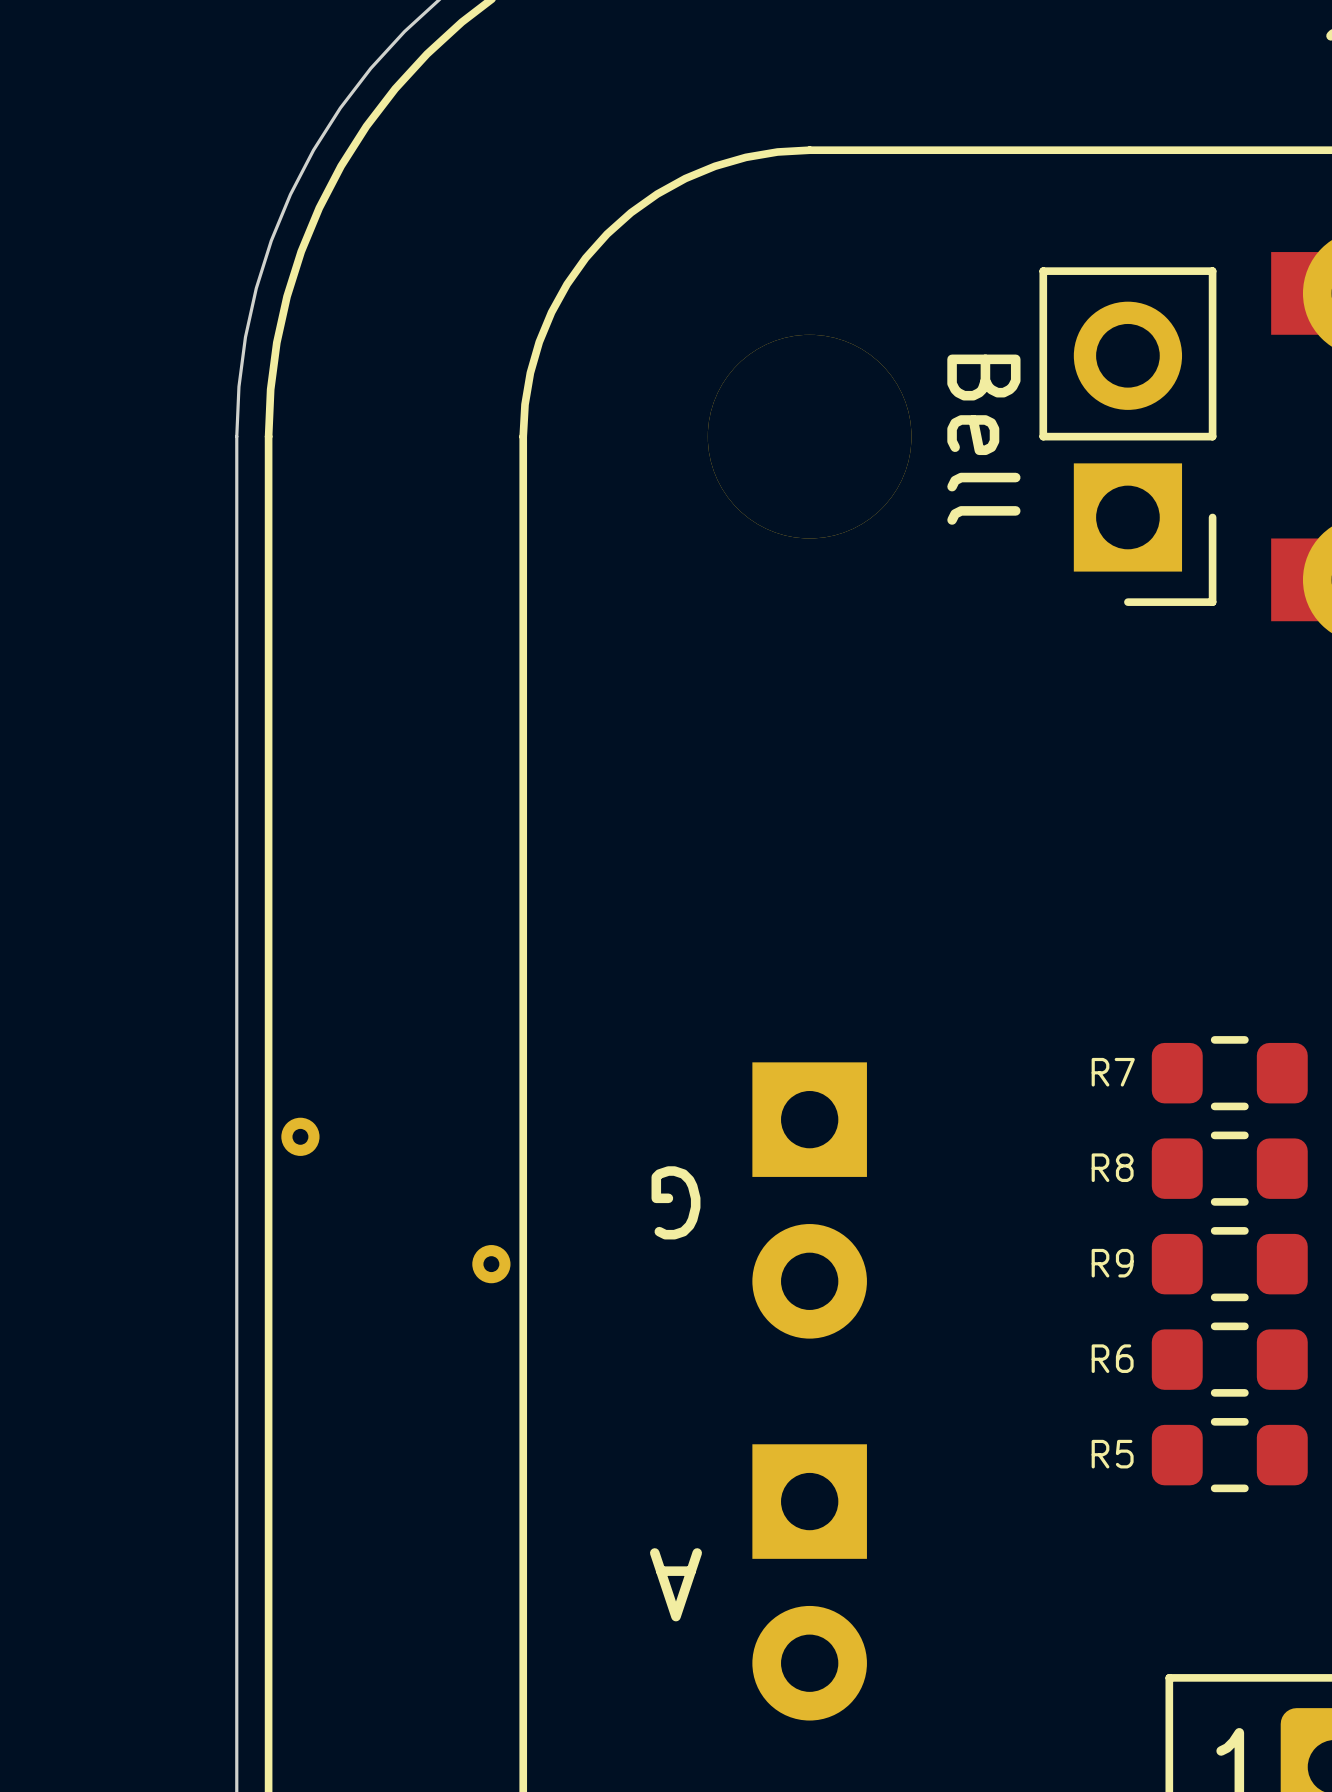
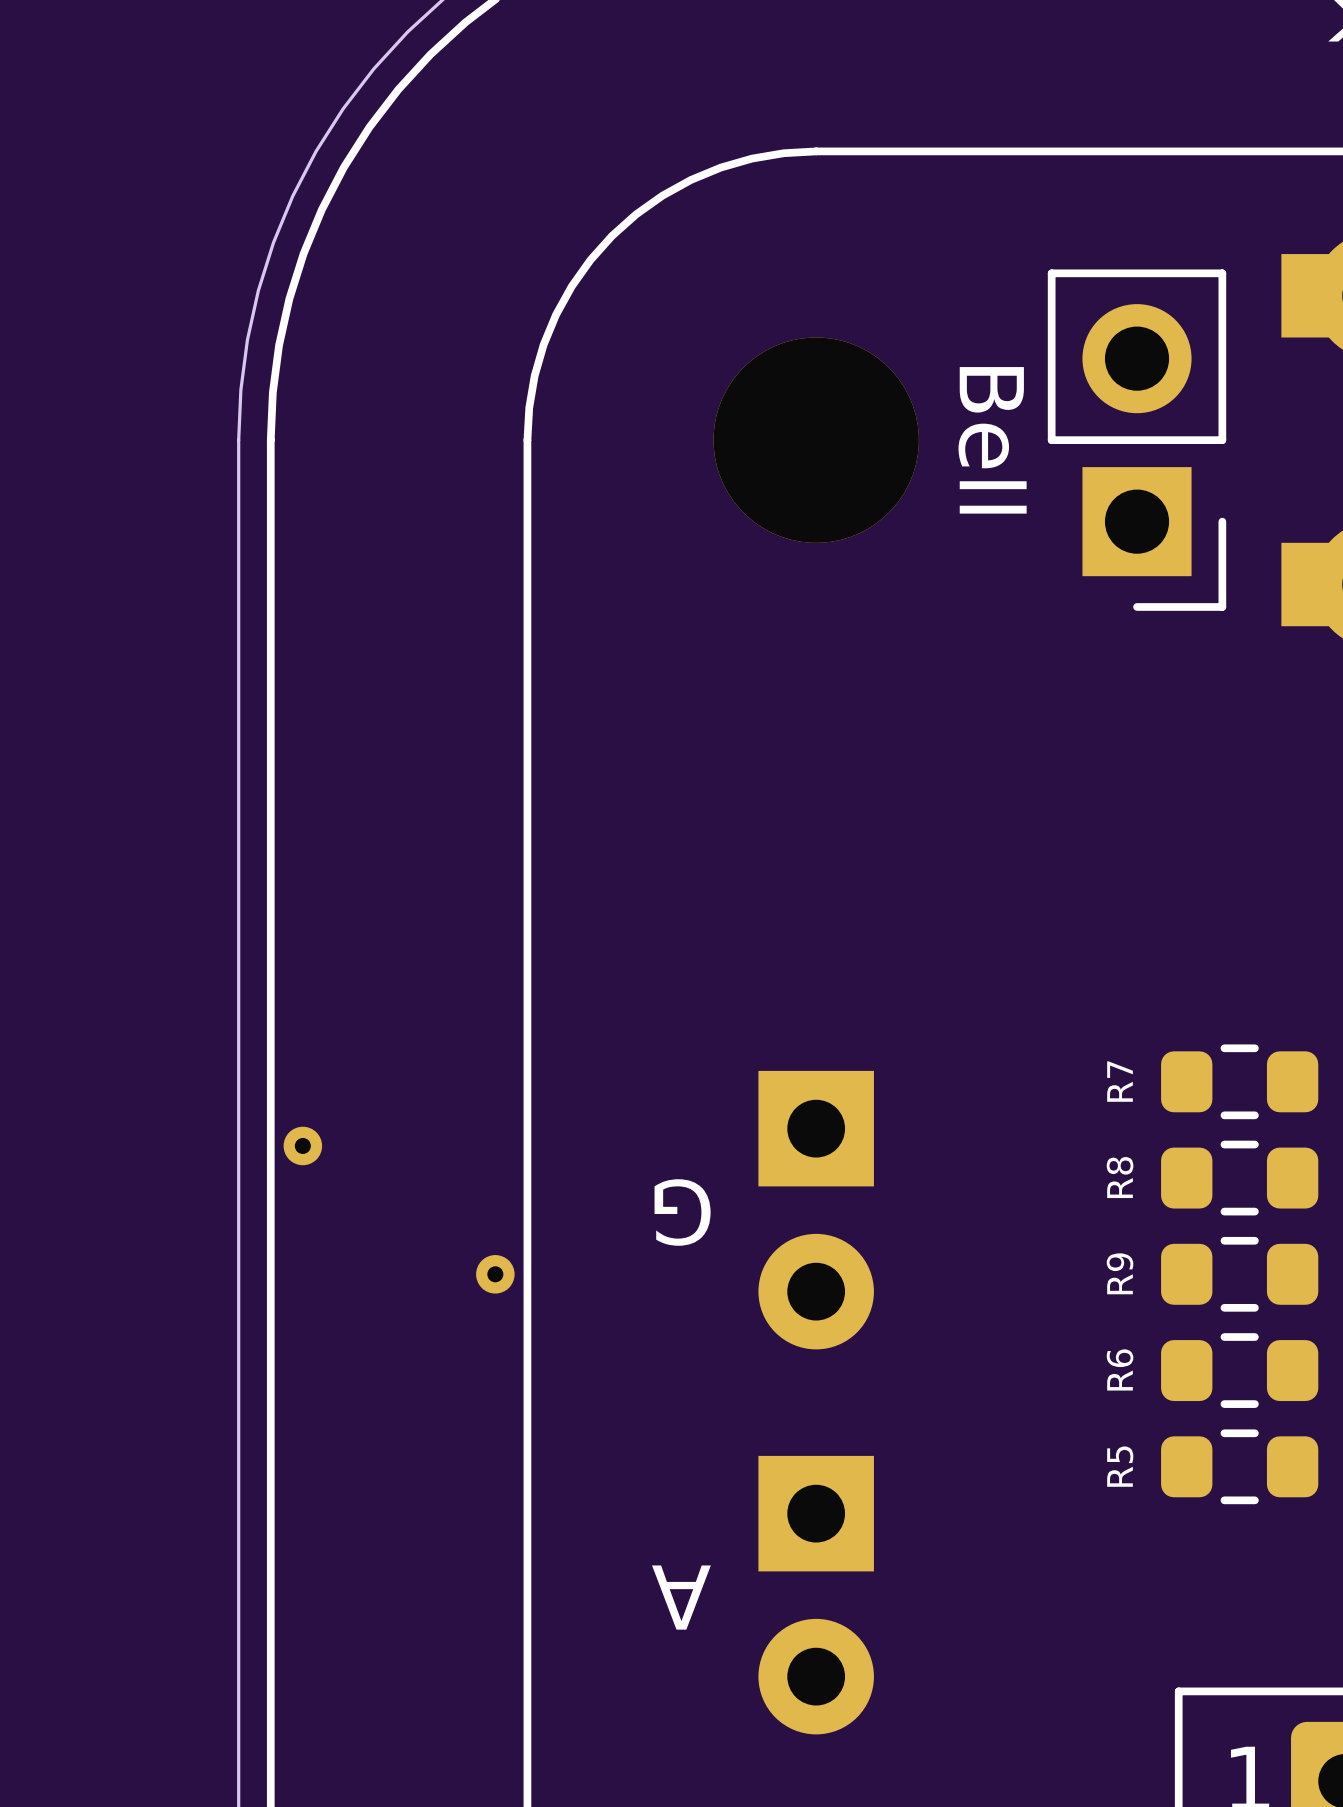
R7 name rotation: 0° (1113, 1072) -> 90° counterclockwise (1120, 1081)
R8 name rotation: 0° (1112, 1167) -> 90° counterclockwise (1120, 1177)
R9 name rotation: 0° (1112, 1263) -> 90° counterclockwise (1120, 1273)
R6 name rotation: 0° (1112, 1358) -> 90° counterclockwise (1120, 1369)
R5 name rotation: 0° (1112, 1454) -> 90° counterclockwise (1120, 1466)

